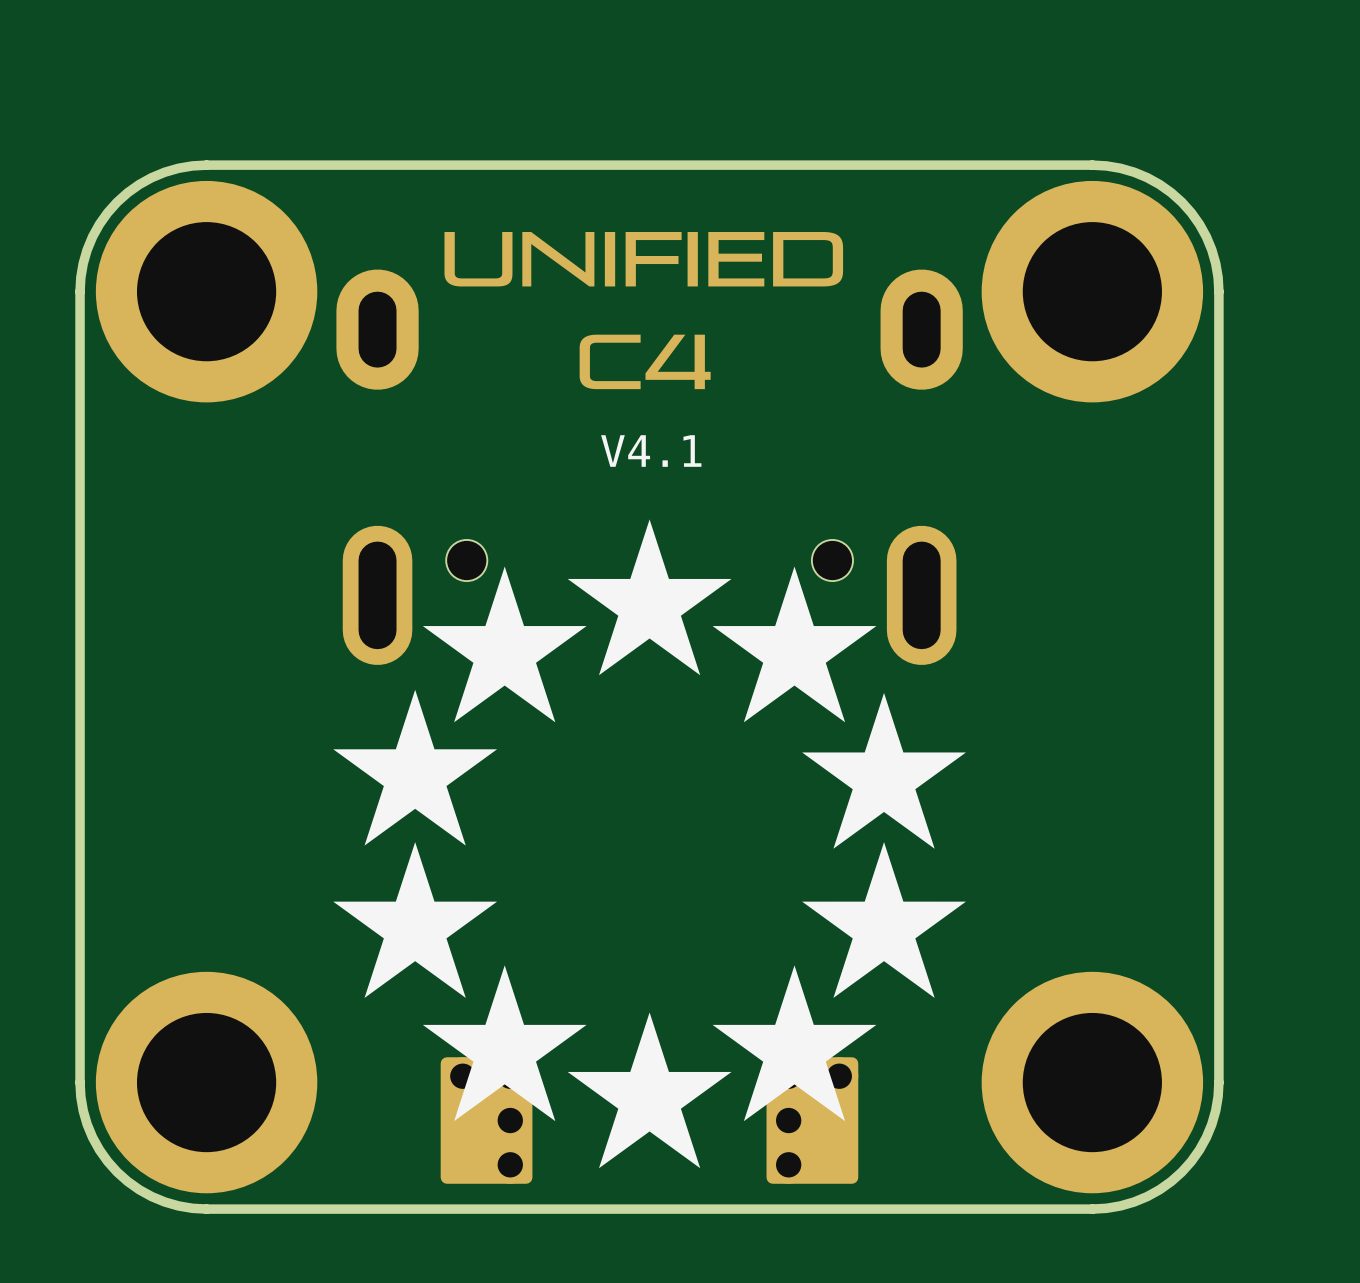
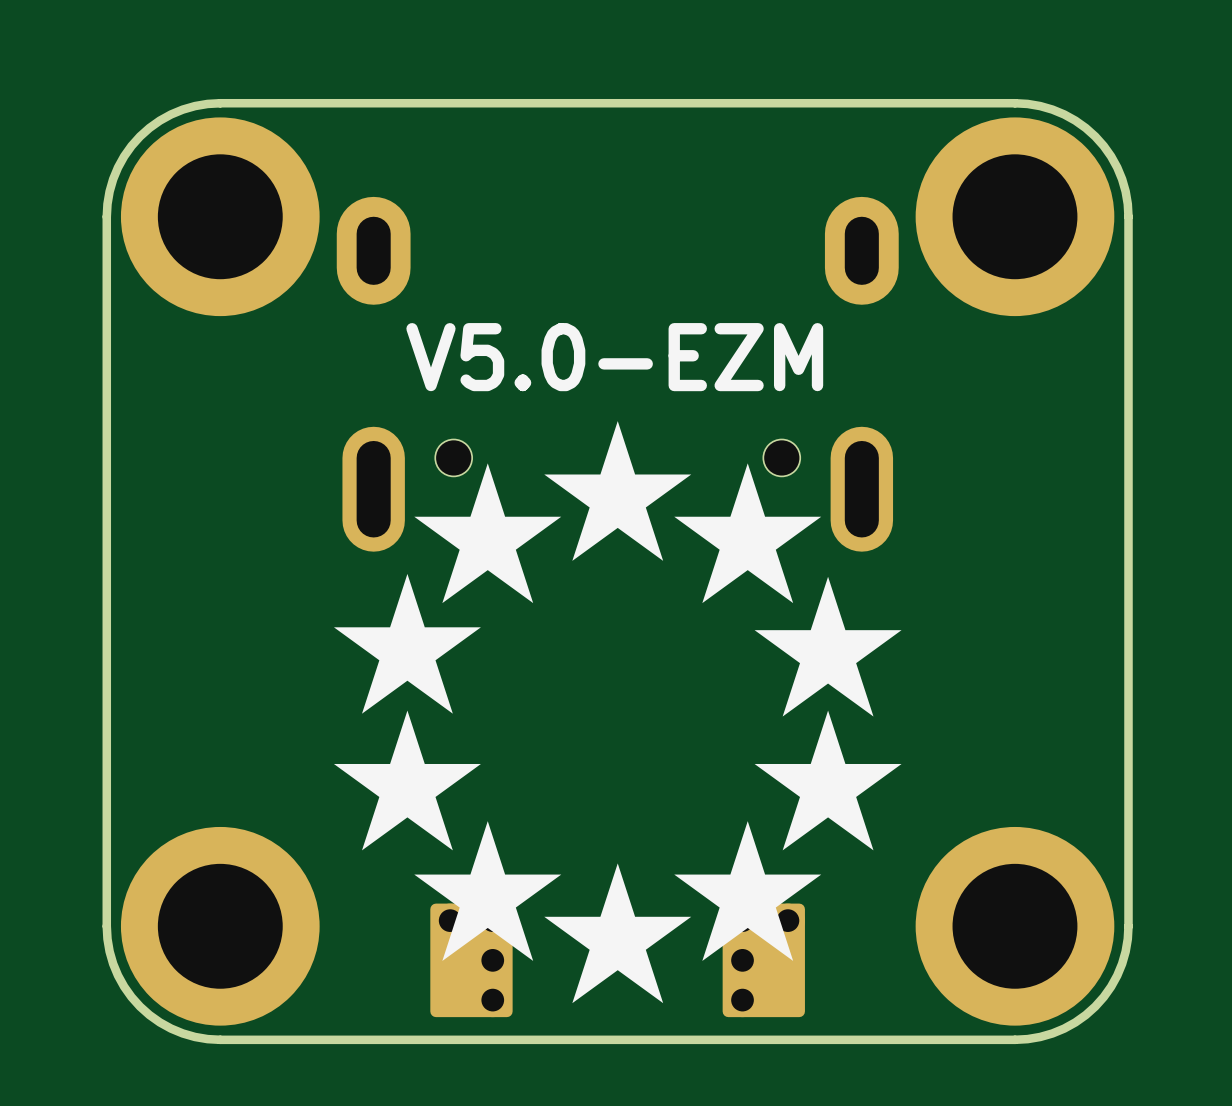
part: (643, 310) -> none
text: V4.1 (651, 451) -> V5.0-EZM (614, 357)

